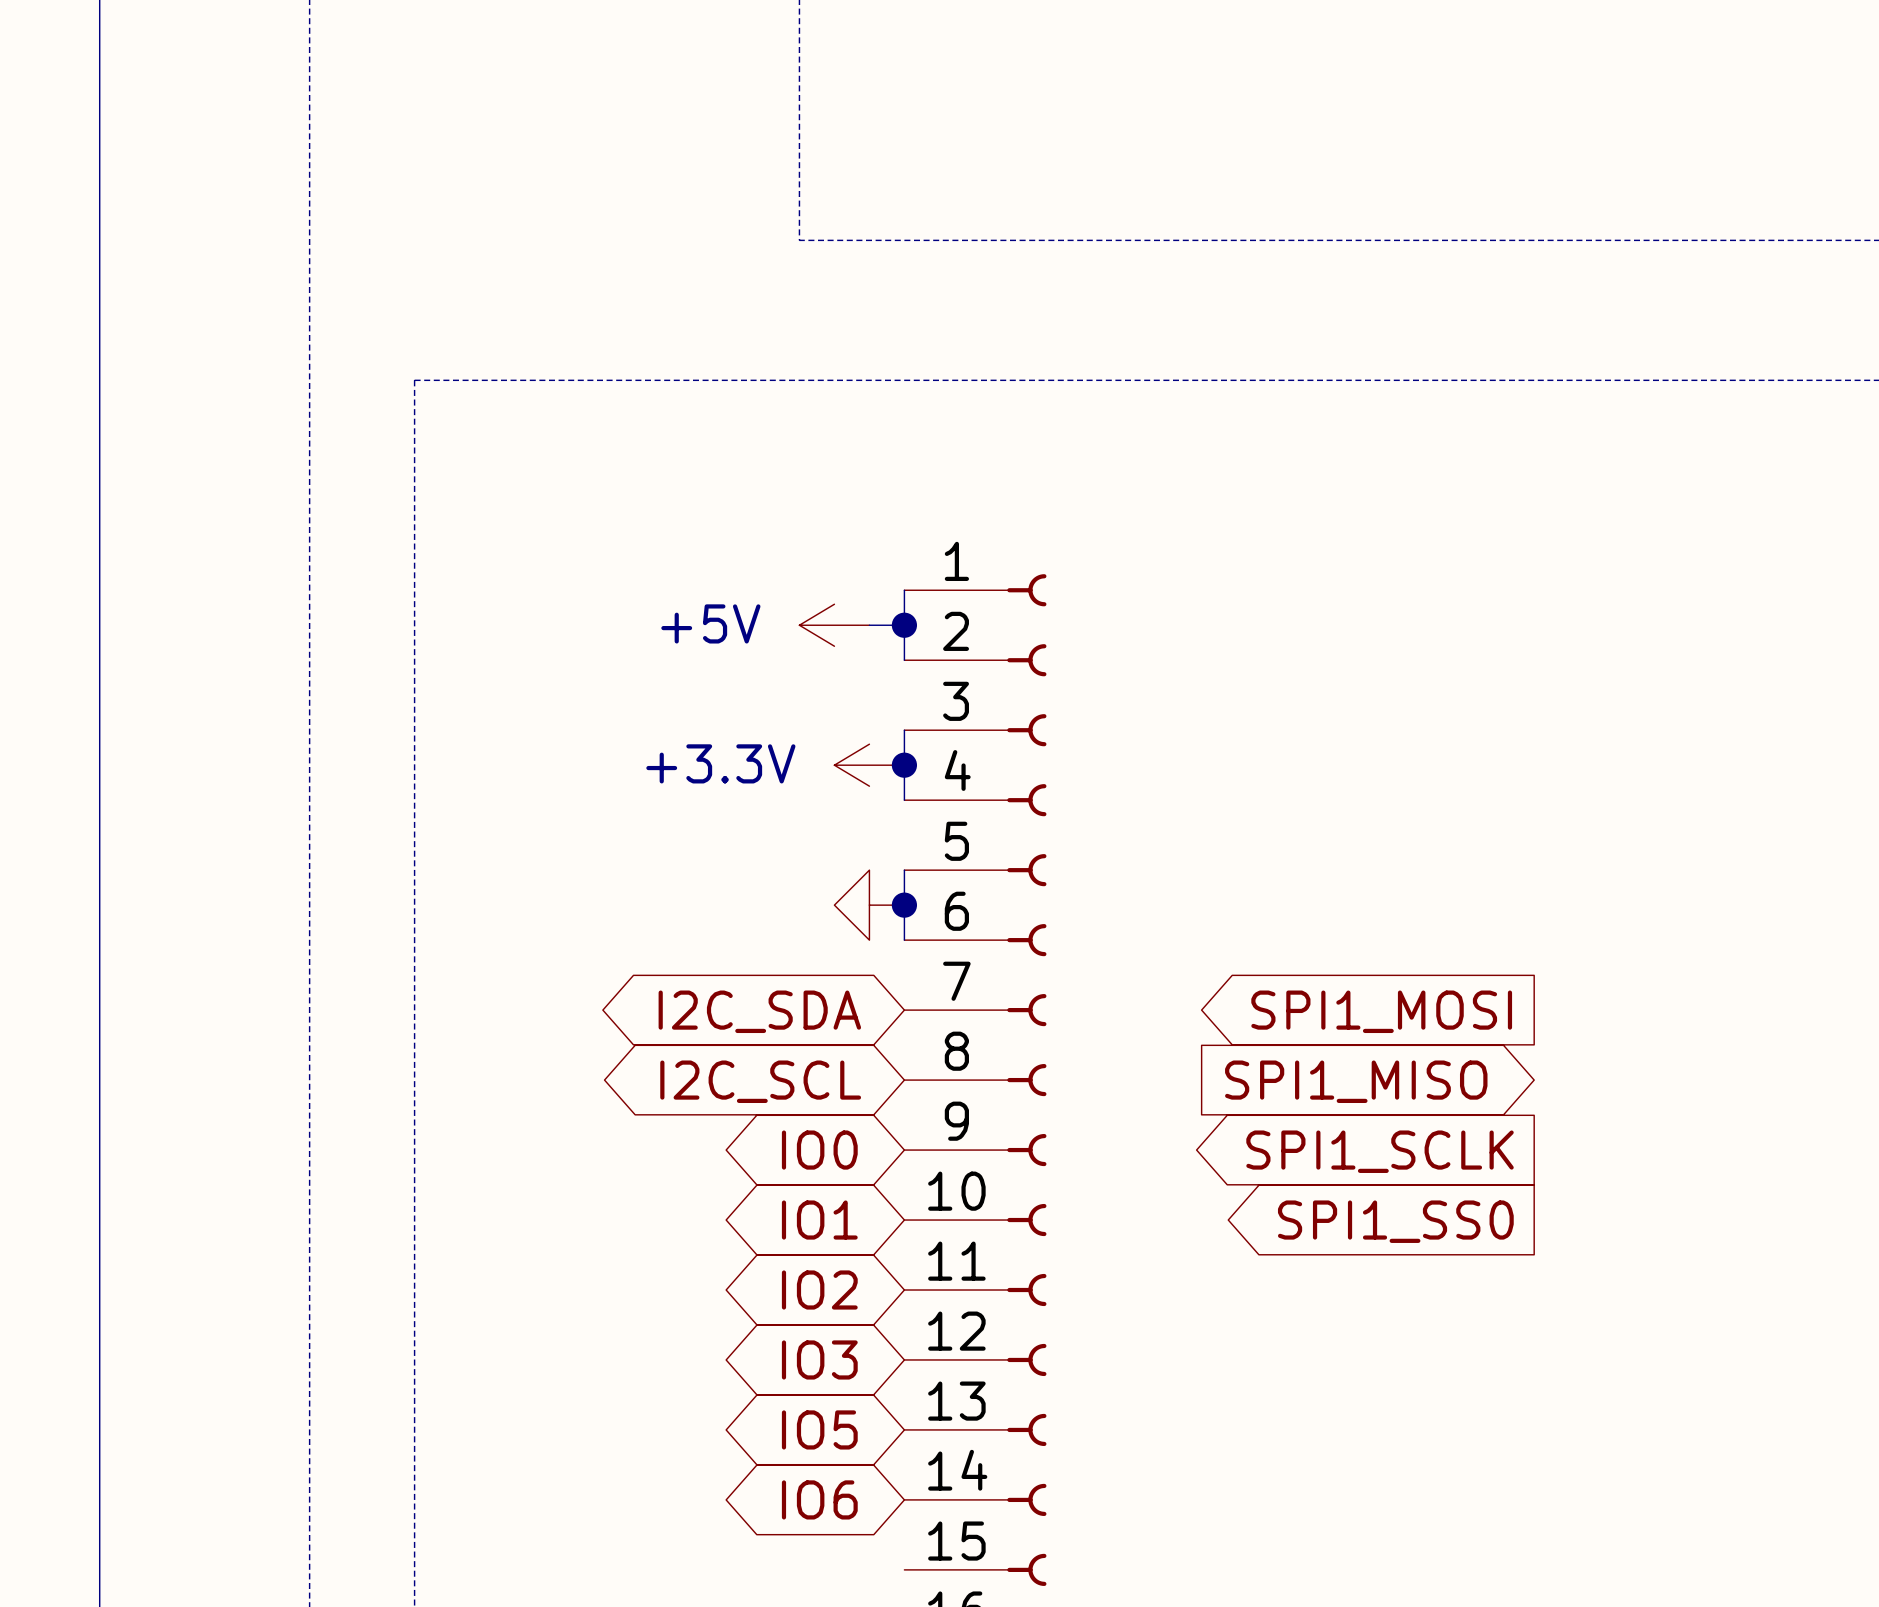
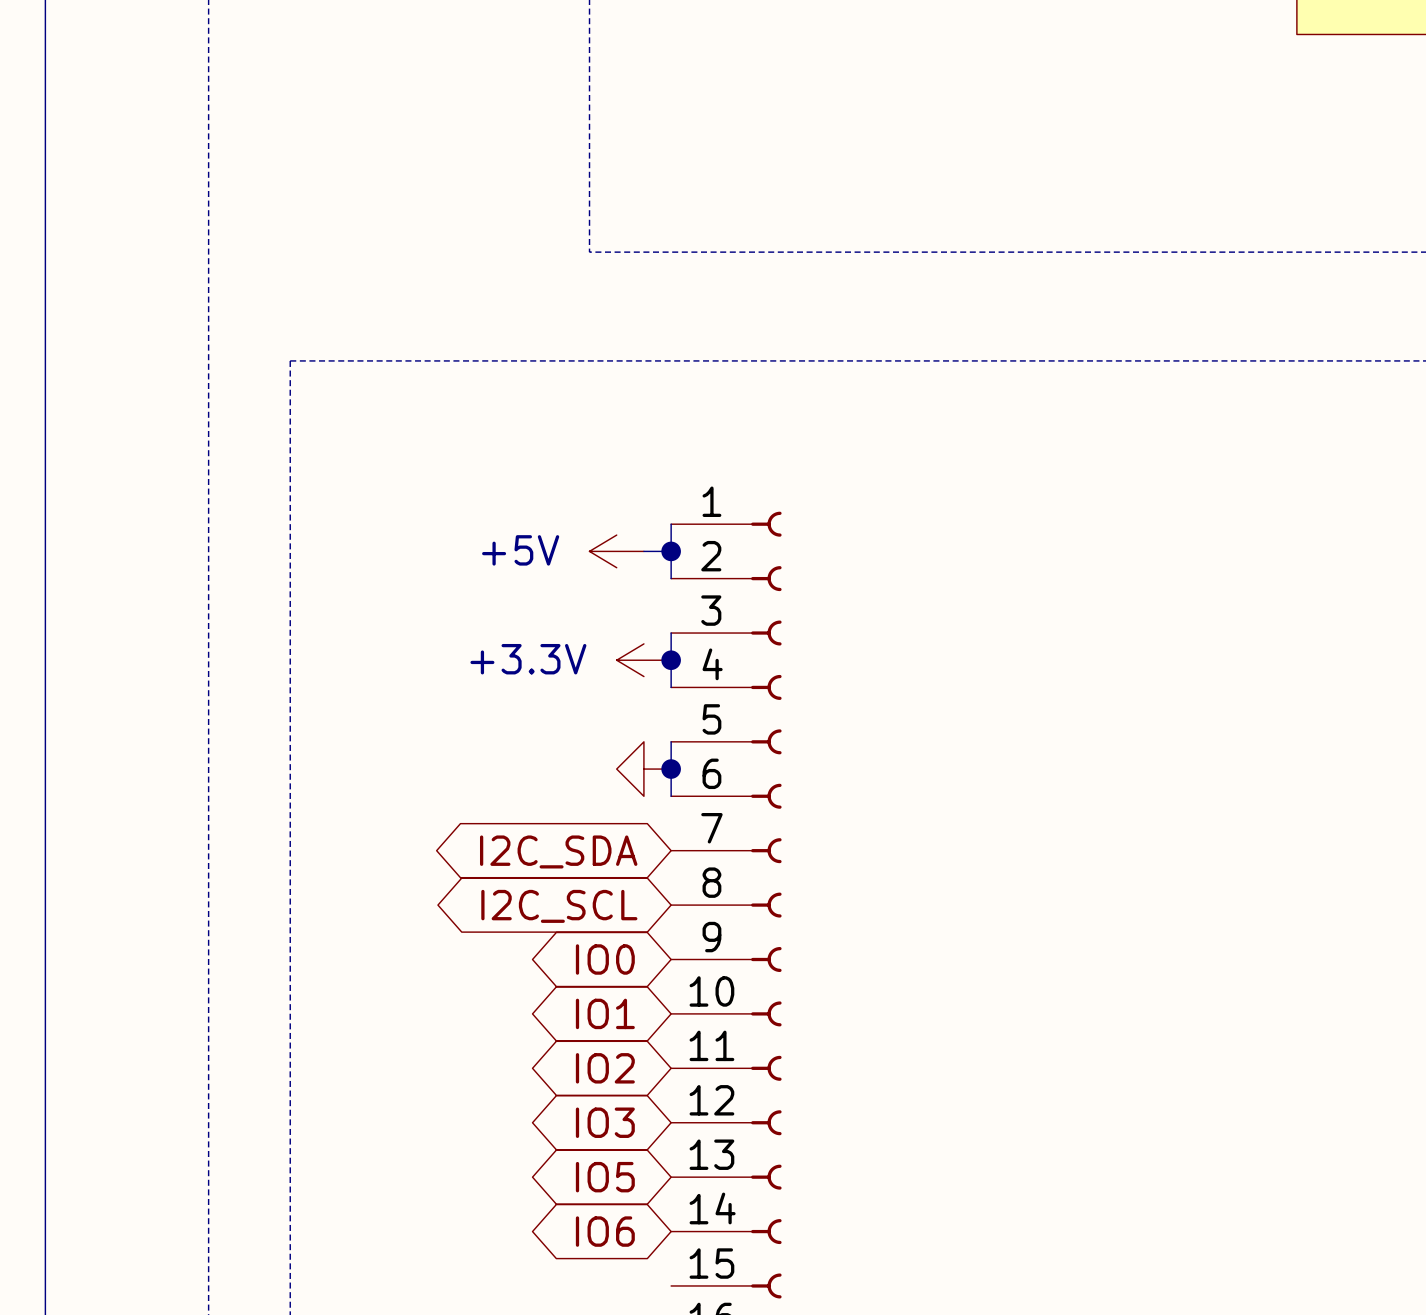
global label: SPI1_MOSI (1381, 1011) -> none
global label: SPI1_MISO (1356, 1081) -> none
global label: SPI1_SCLK (1380, 1151) -> none
global label: SPI1_SS0 (1395, 1221) -> none

